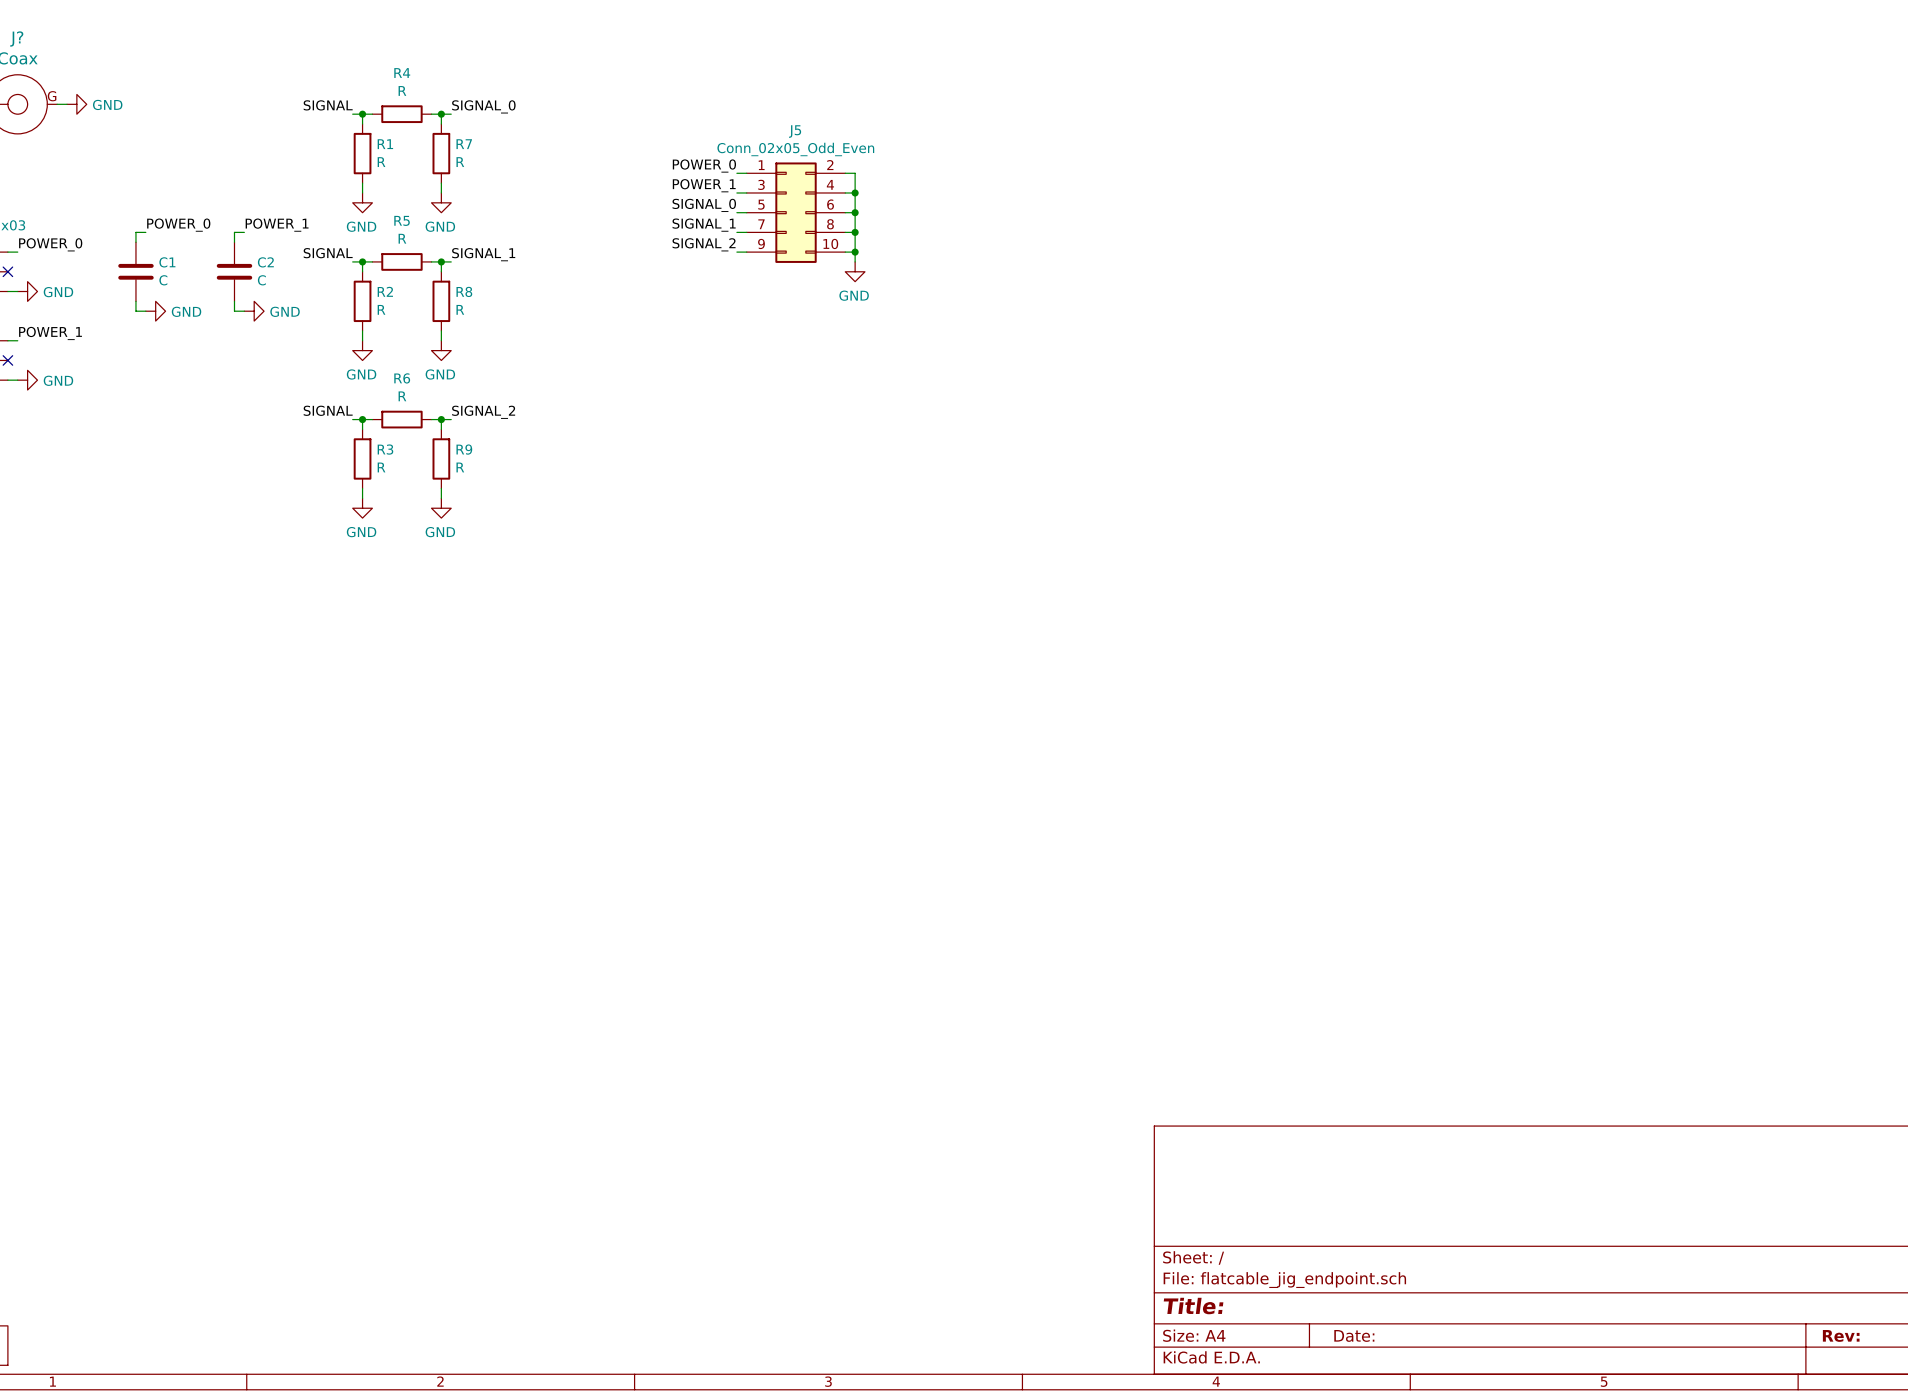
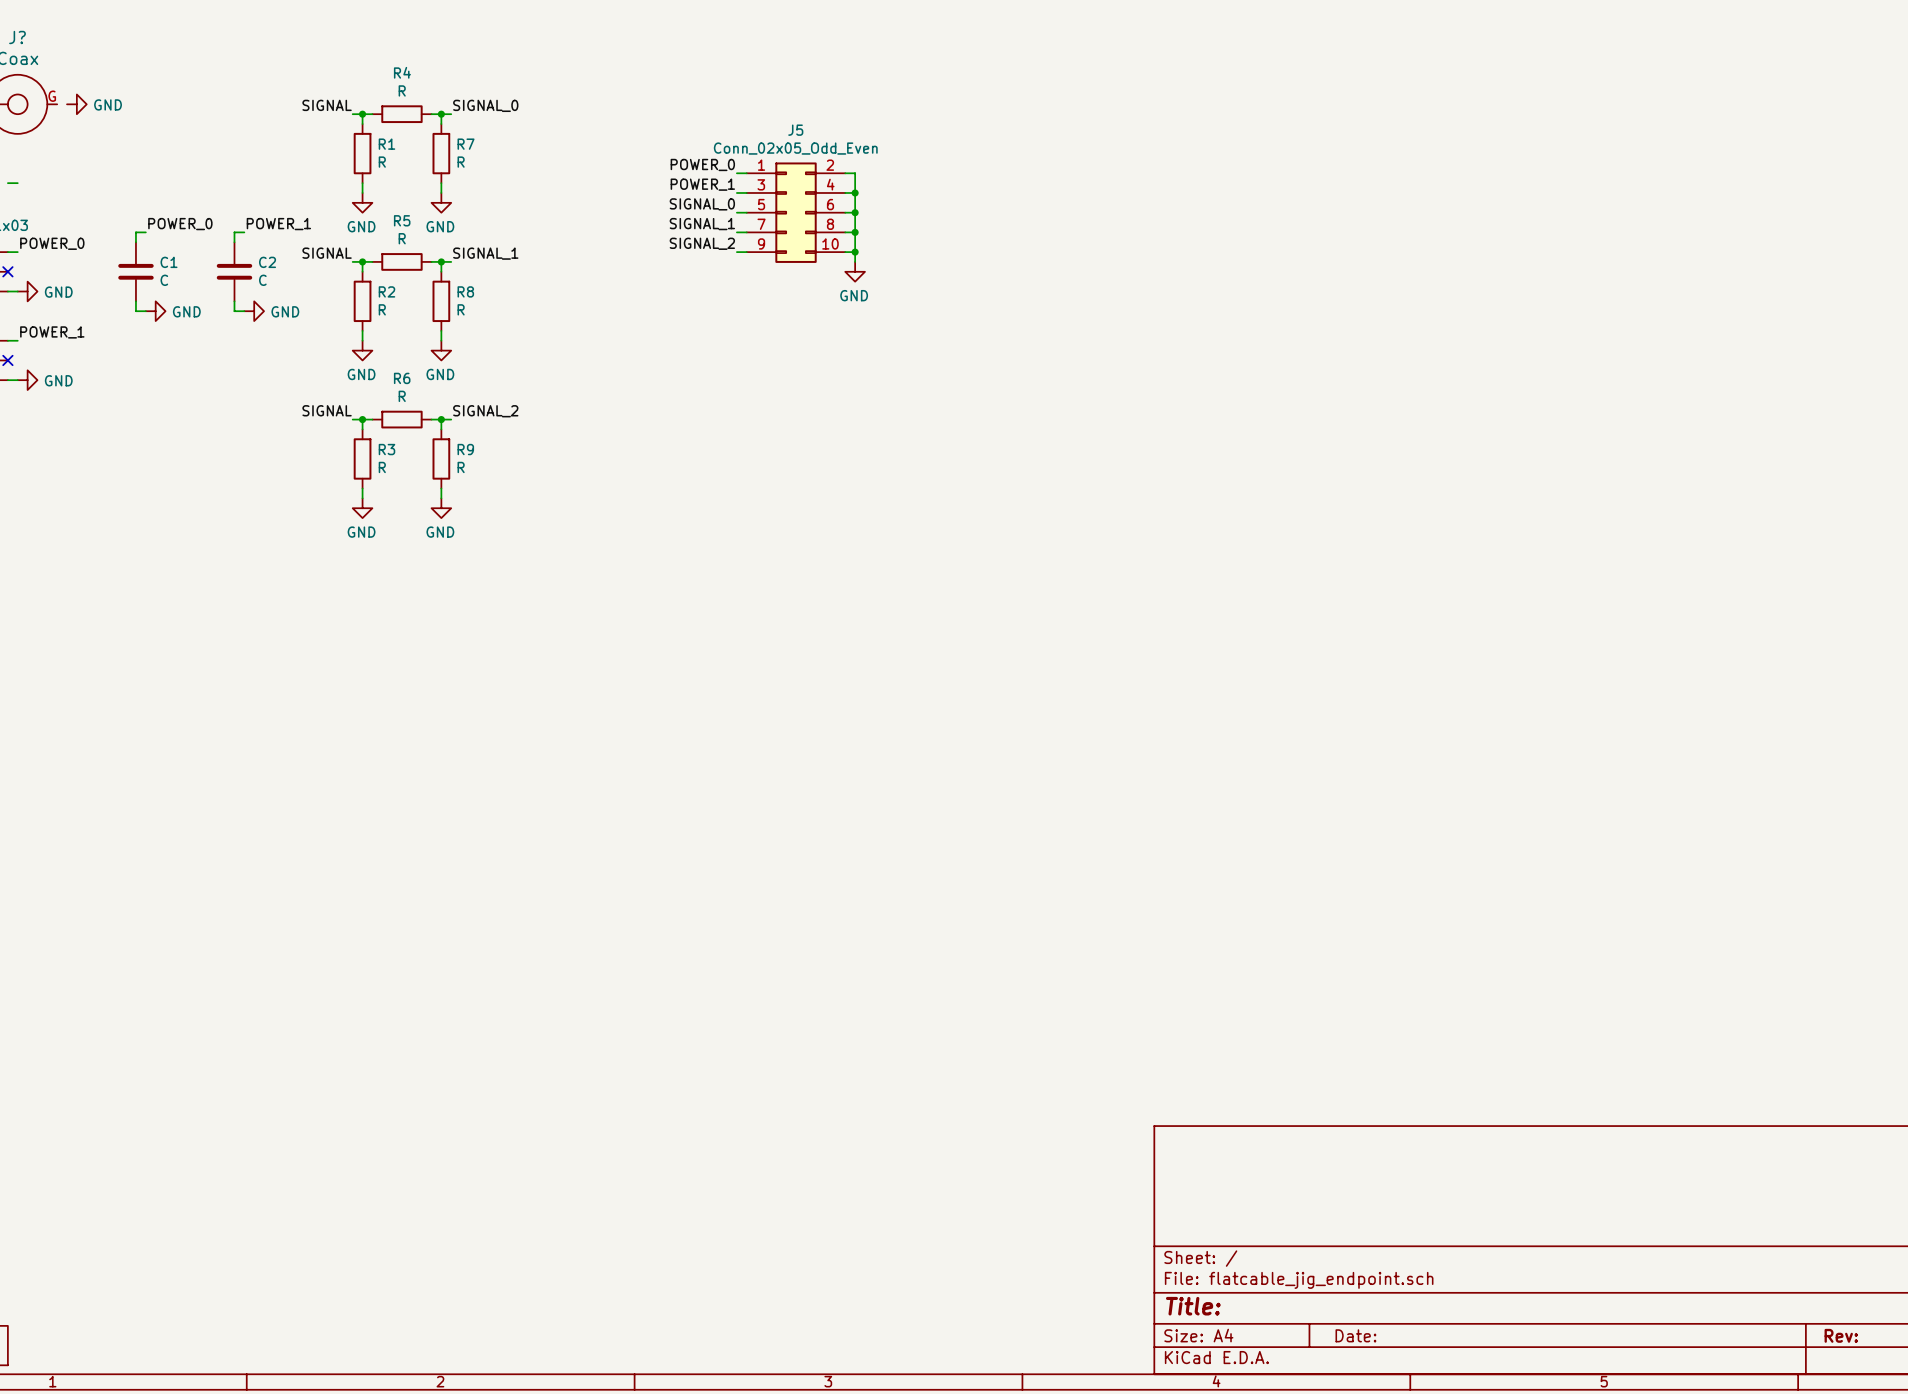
wire: (57, 104) (67, 104) -> (7, 183) (17, 183)

